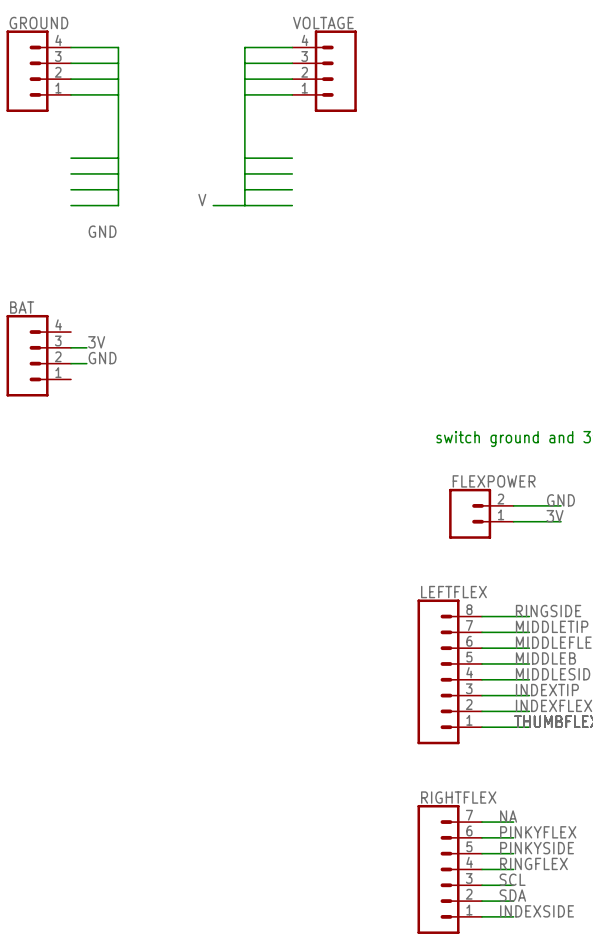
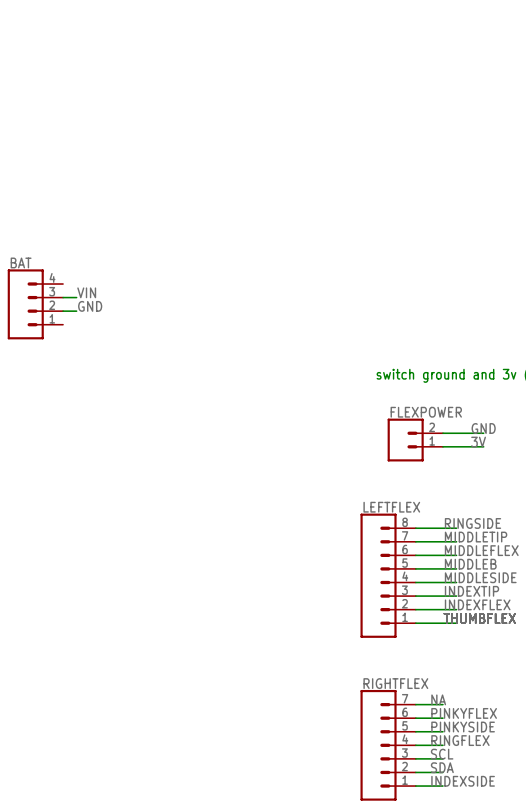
wire: (71, 47) (118, 47) (118, 205) (71, 205) -> none
wire: (292, 47) (244, 47) (244, 205) -> none
wire: (71, 63) (118, 63) -> none
wire: (244, 63) (292, 63) -> none
GROUND: (38, 71) -> none
VOLTAGE: (324, 71) -> none
wire: (71, 79) (118, 79) -> none
wire: (244, 79) (292, 79) -> none
wire: (71, 94) (118, 94) -> none
wire: (244, 94) (292, 94) -> none
wire: (71, 158) (118, 158) -> none
wire: (244, 158) (292, 158) -> none
wire: (71, 173) (118, 173) -> none
wire: (244, 173) (292, 173) -> none
wire: (71, 189) (118, 189) -> none
wire: (244, 189) (292, 189) -> none
label: V (202, 200) -> none
wire: (213, 205) (292, 205) -> none
label: GND (102, 231) -> none
label: 3V (96, 342) -> VIN (86, 292)

